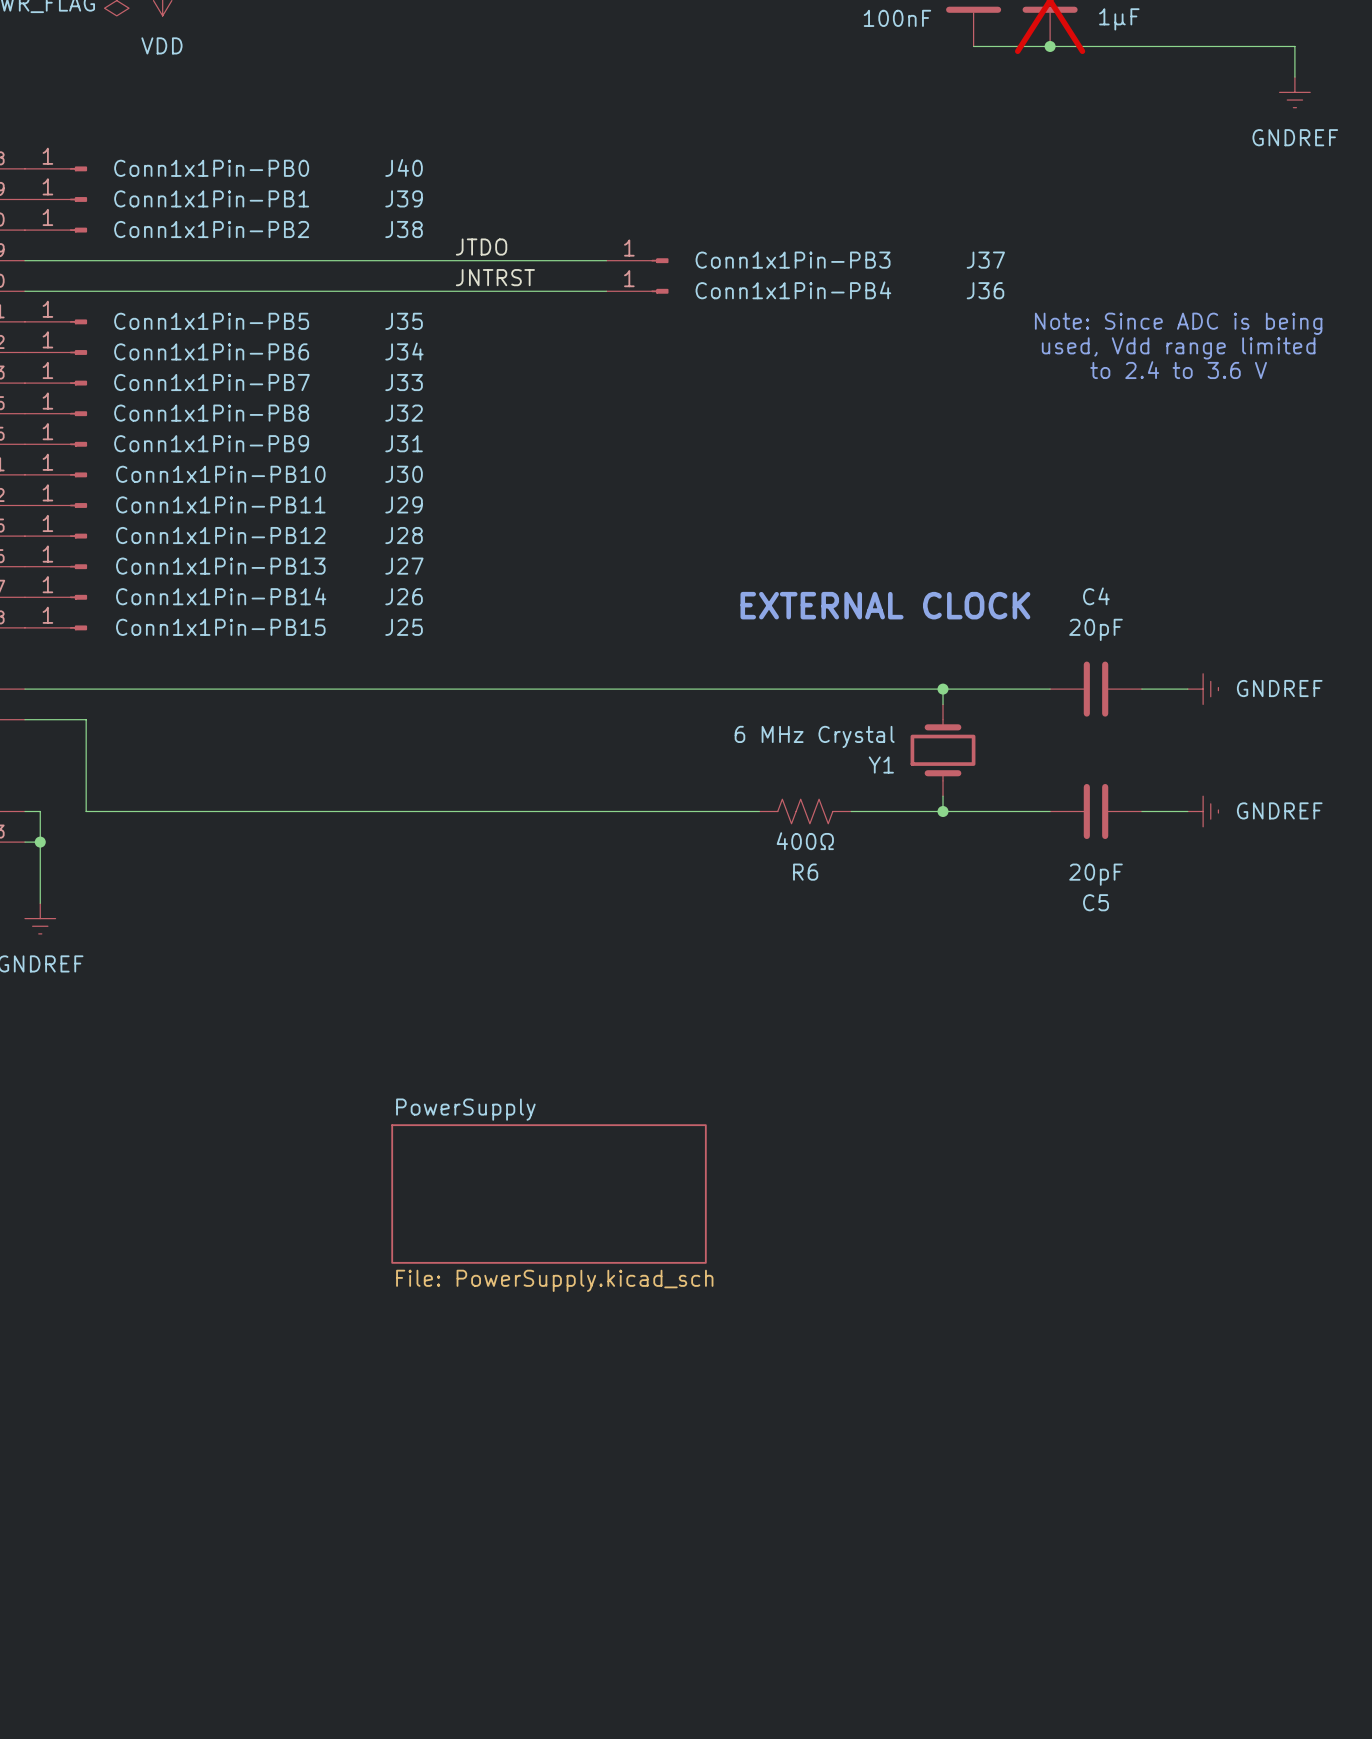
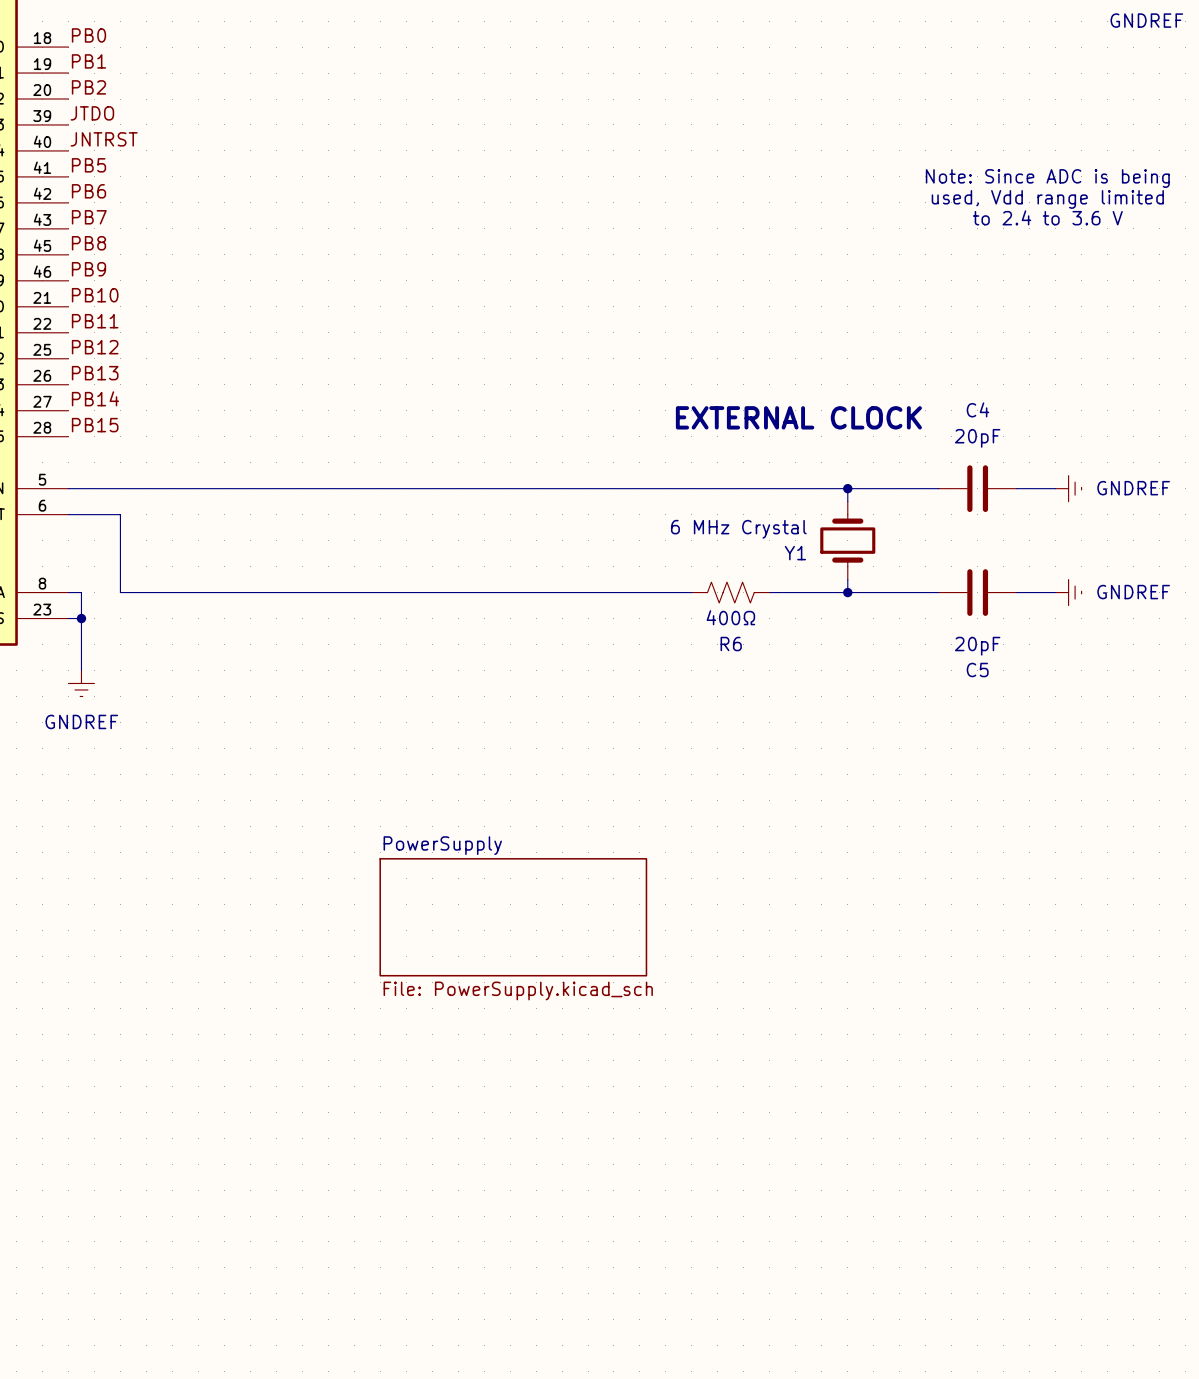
label: none -> PB0 (88, 35)
J40: Conn1x1Pin-PB0 (56, 168) -> none
label: none -> PB1 (88, 61)
J39: Conn1x1Pin-PB1 (56, 199) -> none
label: none -> PB2 (88, 87)
J38: Conn1x1Pin-PB2 (56, 230) -> none
label: none -> JTDO (92, 113)
label: JTDO (481, 247) -> none
wire: (24, 260) (606, 260) -> none
J37: Conn1x1Pin-PB3 (637, 260) -> none
label: none -> JNTRST (104, 139)
label: JNTRST (495, 277) -> none
wire: (24, 291) (606, 291) -> none
J36: Conn1x1Pin-PB4 (637, 291) -> none
label: none -> PB5 (88, 165)
J35: Conn1x1Pin-PB5 (56, 321) -> none
label: none -> PB6 (88, 191)
J34: Conn1x1Pin-PB6 (56, 352) -> none
label: none -> PB7 (89, 217)
J33: Conn1x1Pin-PB7 (56, 383) -> none
label: none -> PB8 (88, 243)
J32: Conn1x1Pin-PB8 (56, 413) -> none
label: none -> PB9 (88, 269)
J31: Conn1x1Pin-PB9 (56, 444) -> none
label: none -> PB10 (95, 295)
J30: Conn1x1Pin-PB10 (56, 474) -> none
label: none -> PB11 (95, 321)
J29: Conn1x1Pin-PB11 (56, 505) -> none
label: none -> PB12 (95, 347)
J28: Conn1x1Pin-PB12 (56, 536) -> none
label: none -> PB13 (95, 373)
J27: Conn1x1Pin-PB13 (56, 566) -> none
label: none -> PB14 (95, 398)
J26: Conn1x1Pin-PB14 (56, 597) -> none
label: none -> PB15 (95, 425)
J25: Conn1x1Pin-PB15 (56, 627) -> none

